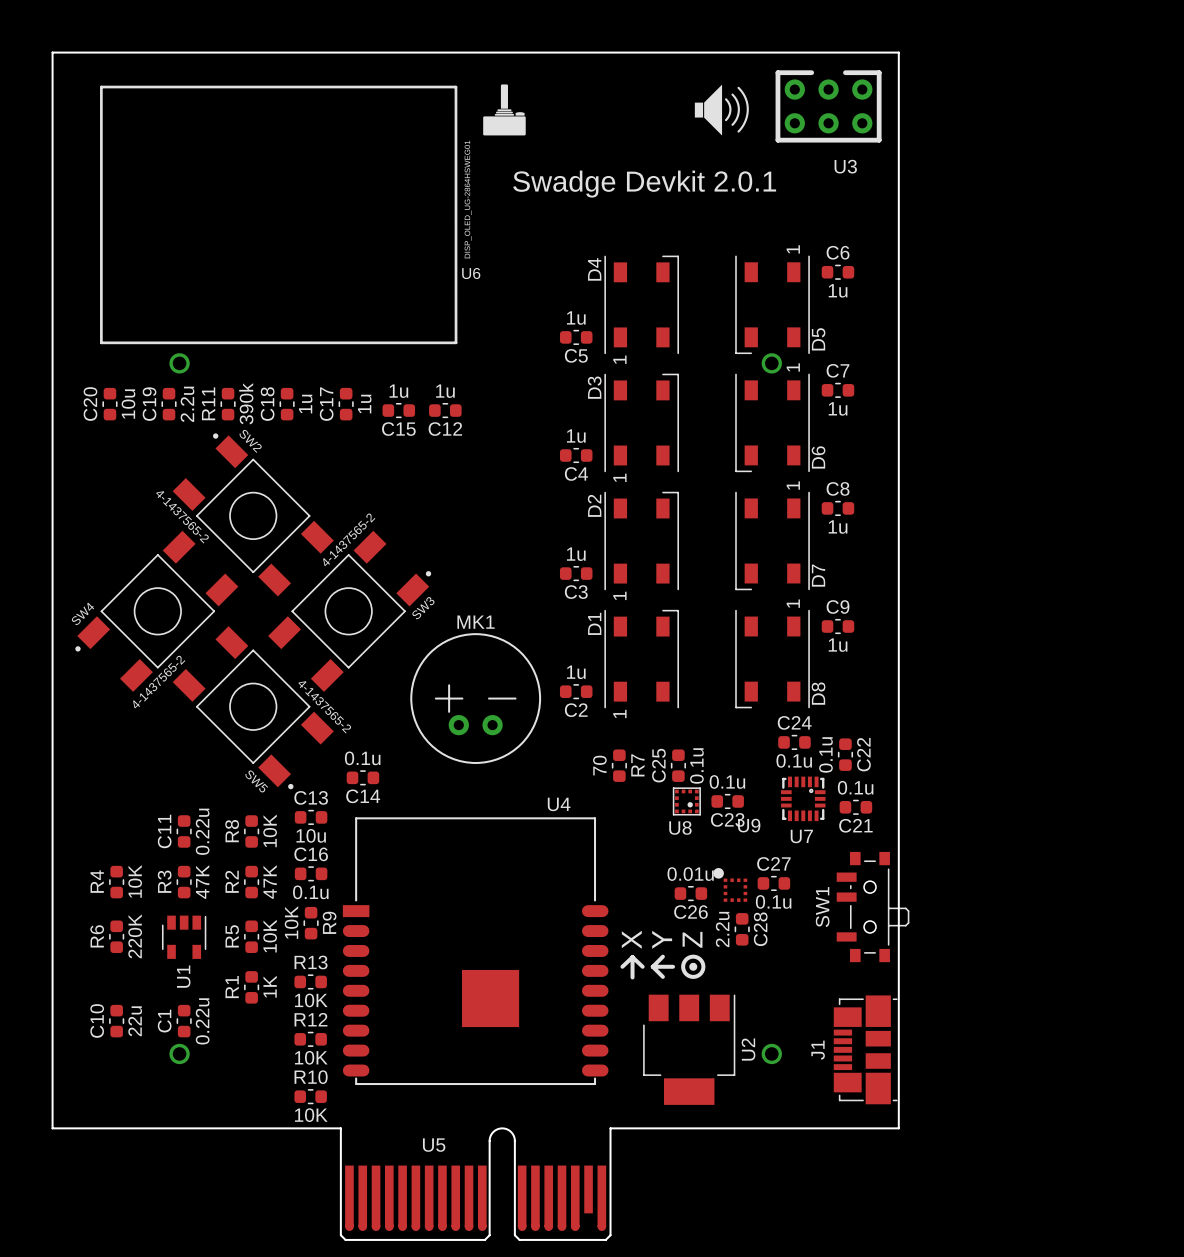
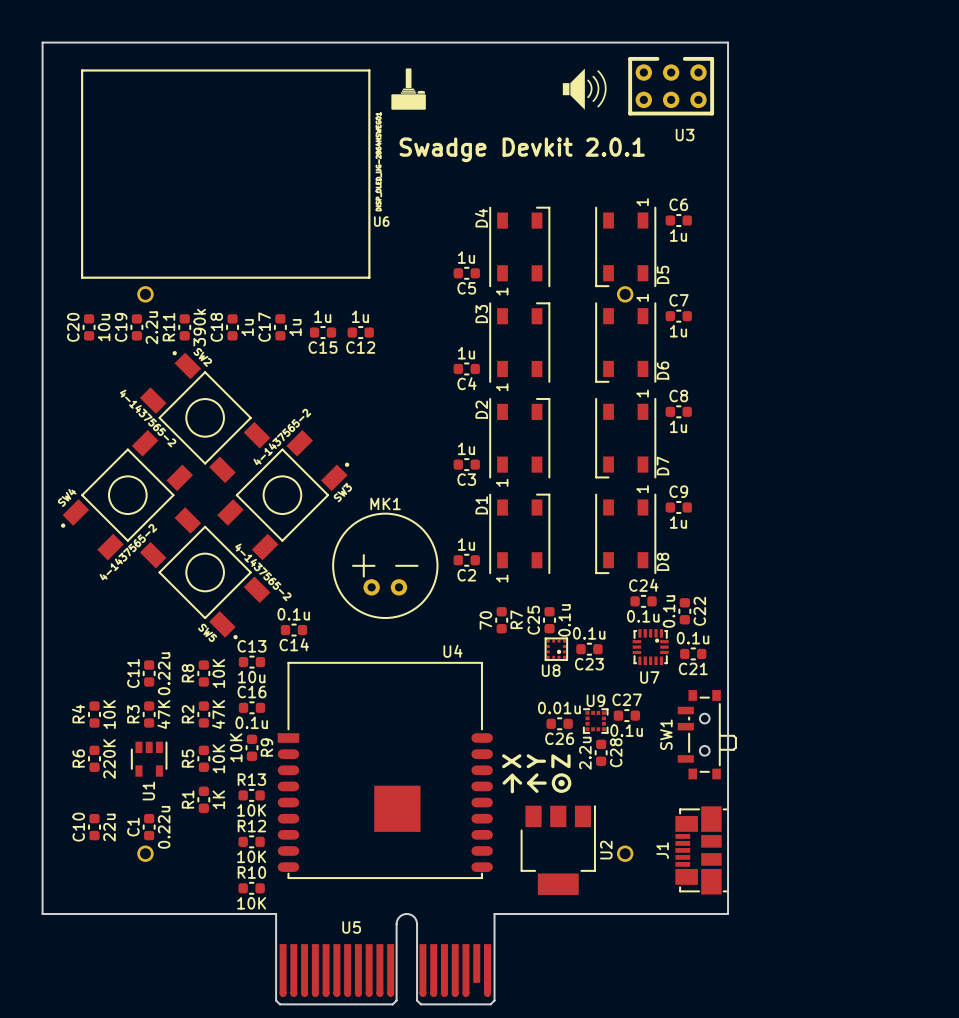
U9 name position: U9 (749, 825) -> U9 (595, 700)
U9 footprint: [713, 868, 748, 902] -> [583, 708, 609, 734]

